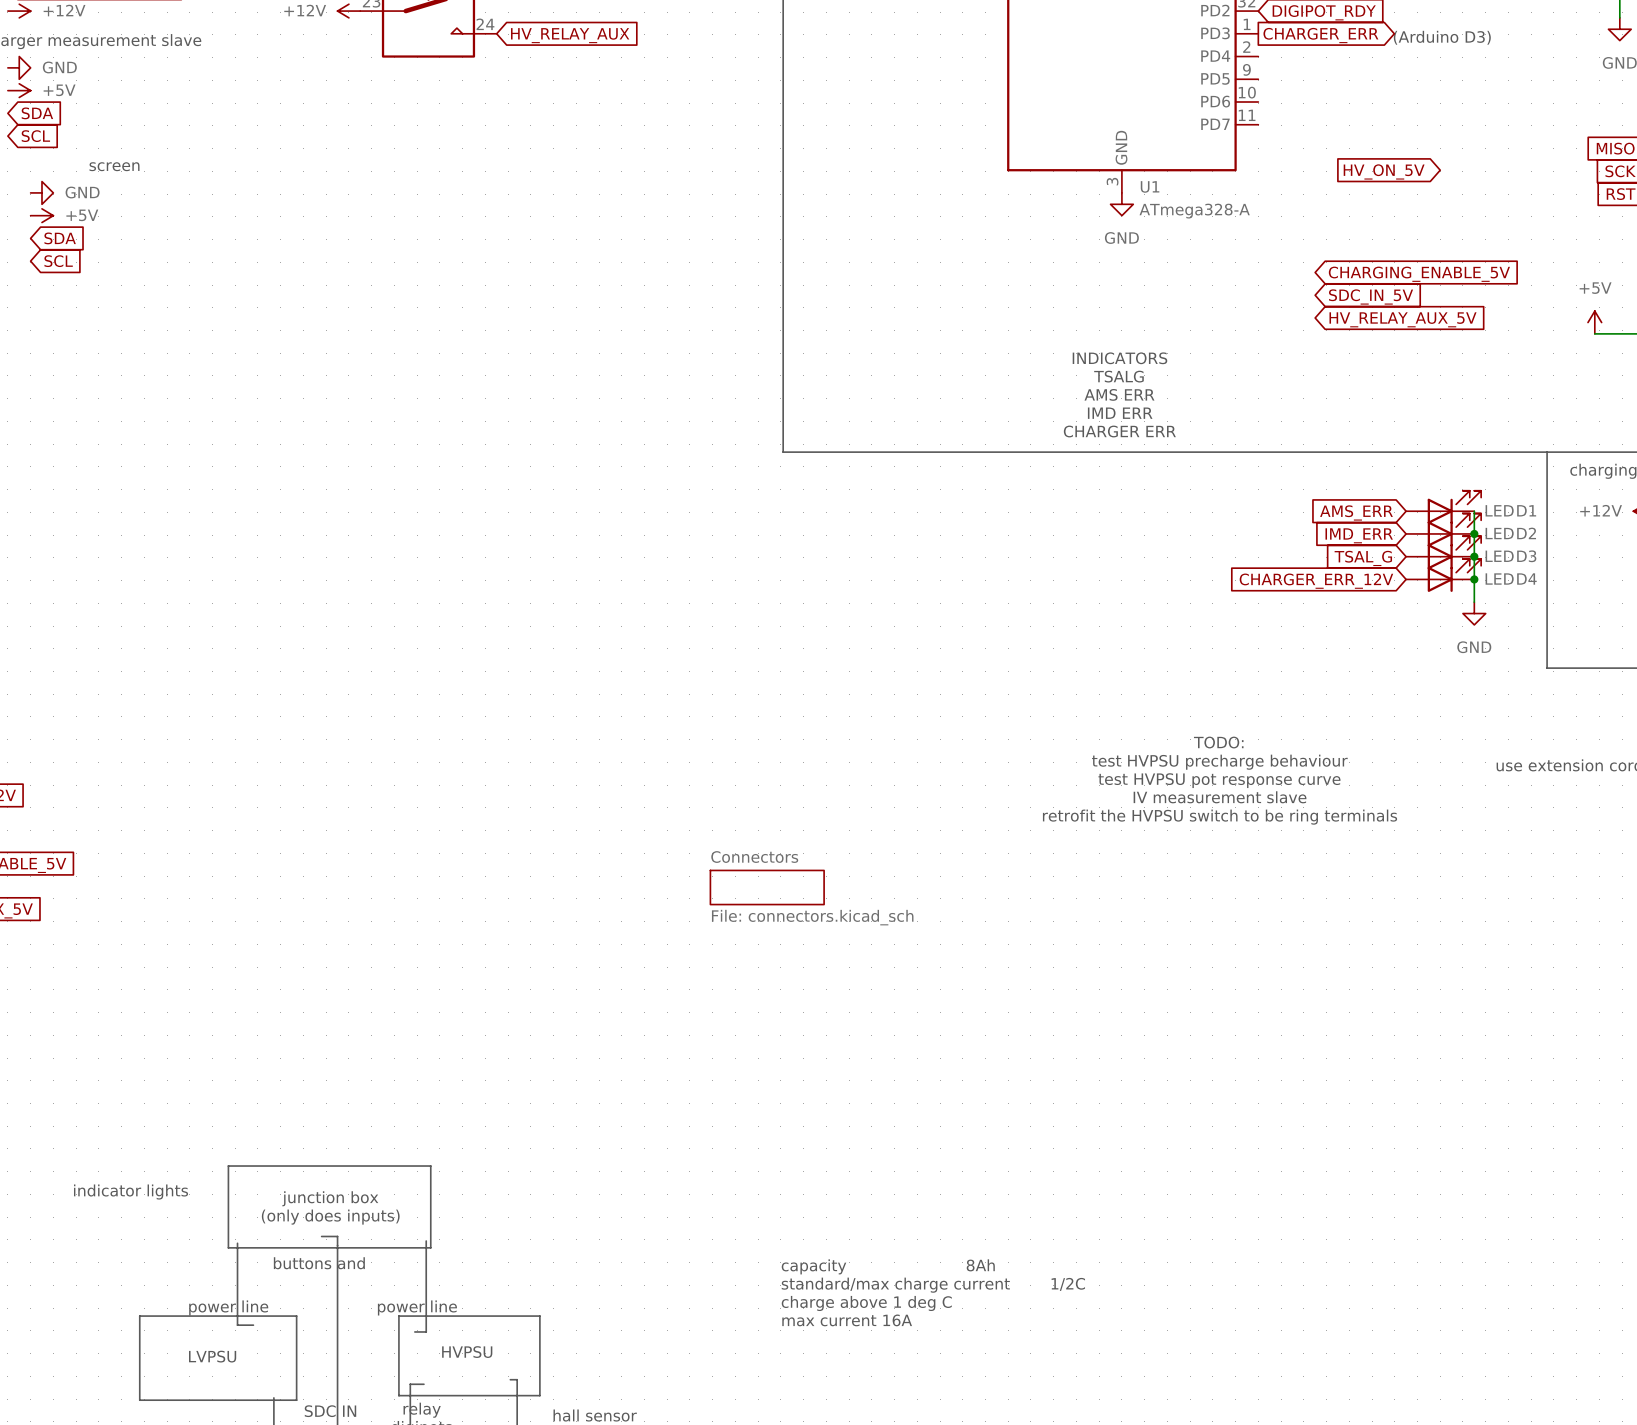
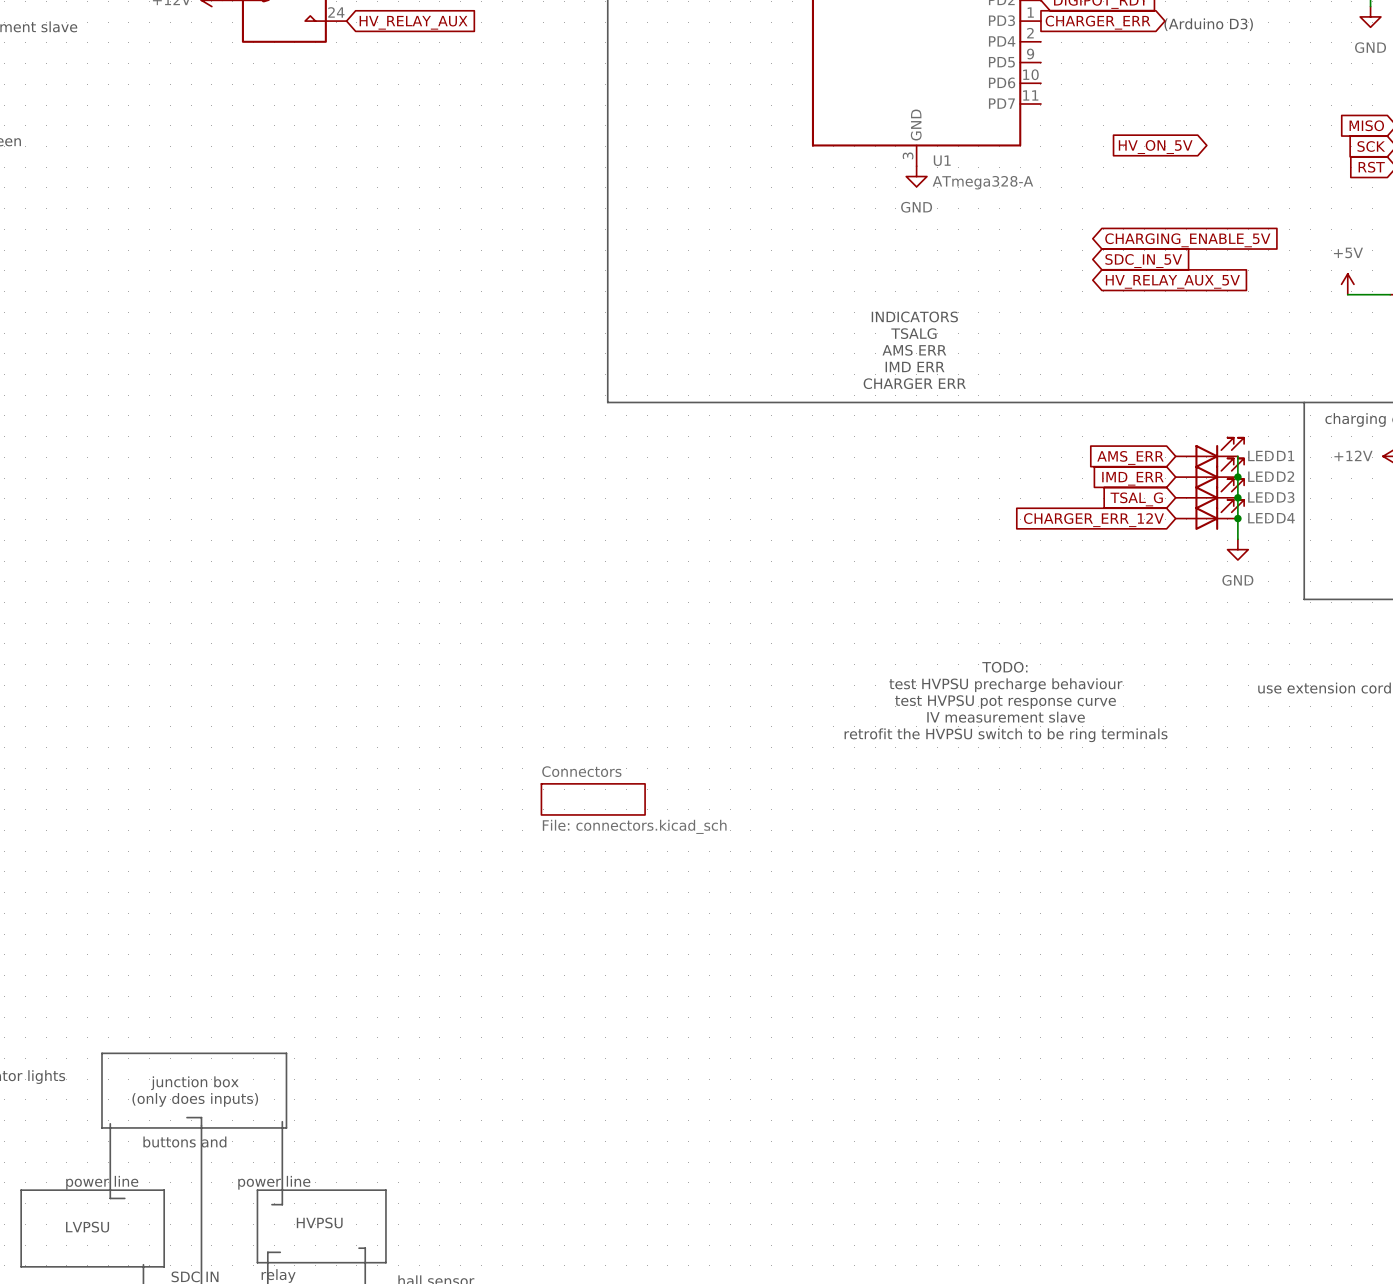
text: capacity 8Ah (888, 1266) -> none
text: standard/max charge current 1/2C (933, 1285) -> none
text: charge above 1 deg C (866, 1303) -> none
text: max current 16A (847, 1320) -> none

